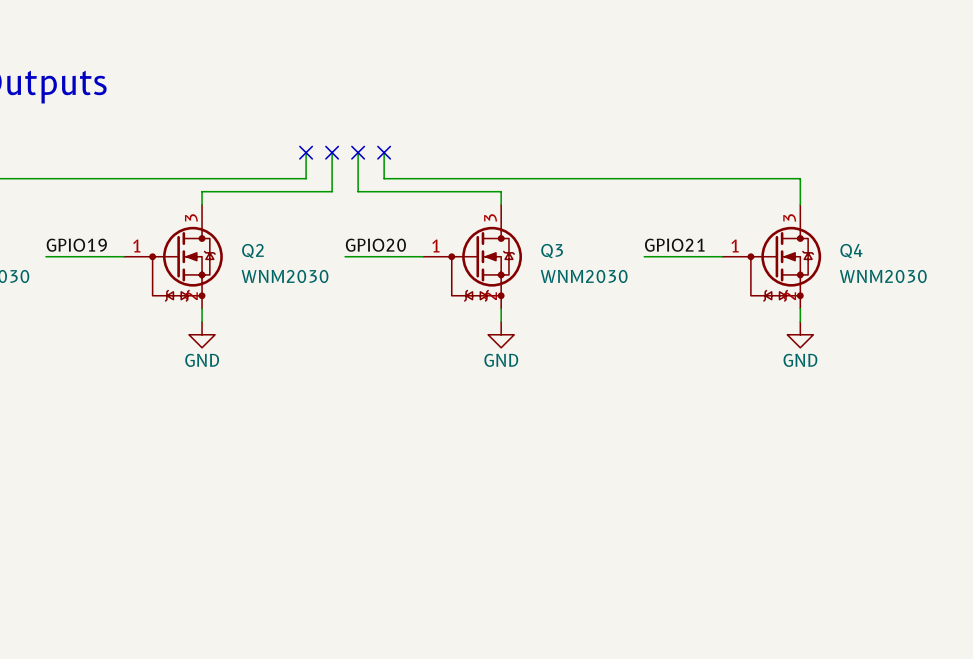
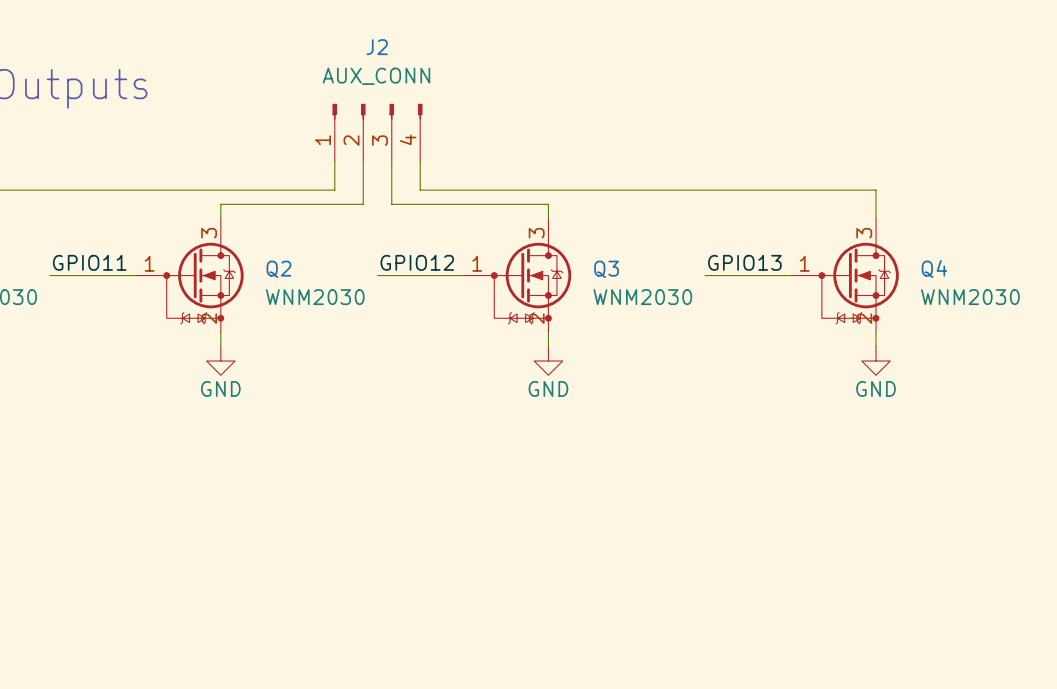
J2: none -> AUX_CONN (377, 132)
no-connect mark: (306, 152) -> none
no-connect mark: (332, 152) -> none
no-connect mark: (358, 152) -> none
no-connect mark: (384, 152) -> none
label: GPIO19 (76, 245) -> GPIO11 (89, 262)
label: GPIO20 (375, 245) -> GPIO12 (417, 262)
label: GPIO21 (674, 245) -> GPIO13 (744, 262)

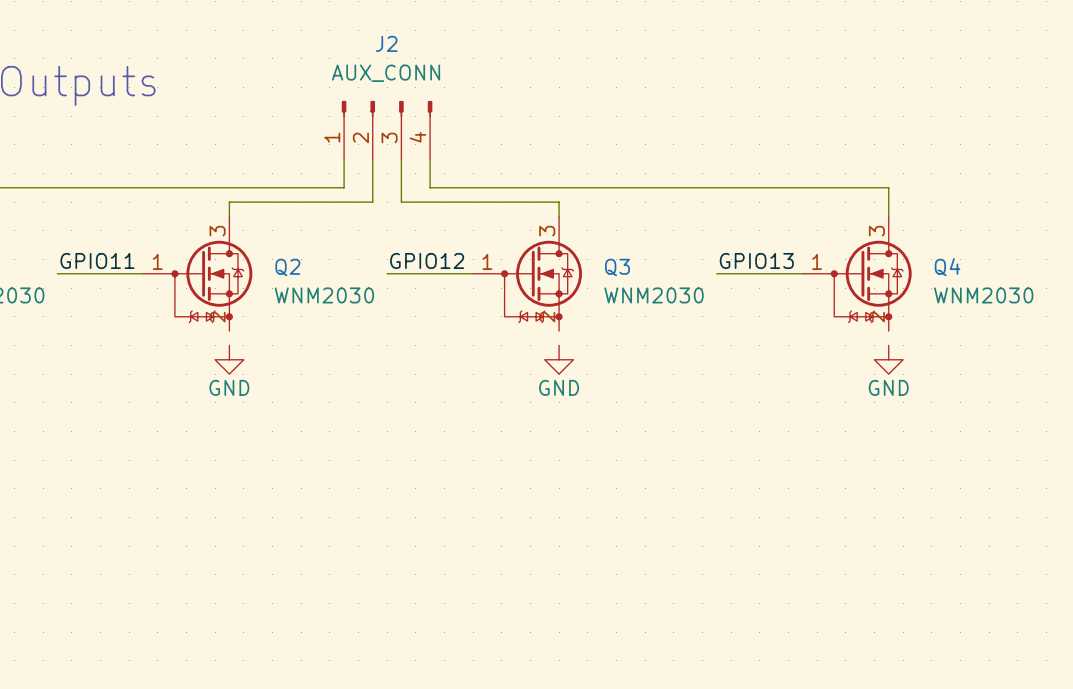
wire: (220, 332) (220, 346) -> none
wire: (548, 332) (548, 346) -> none
wire: (876, 332) (876, 346) -> none

